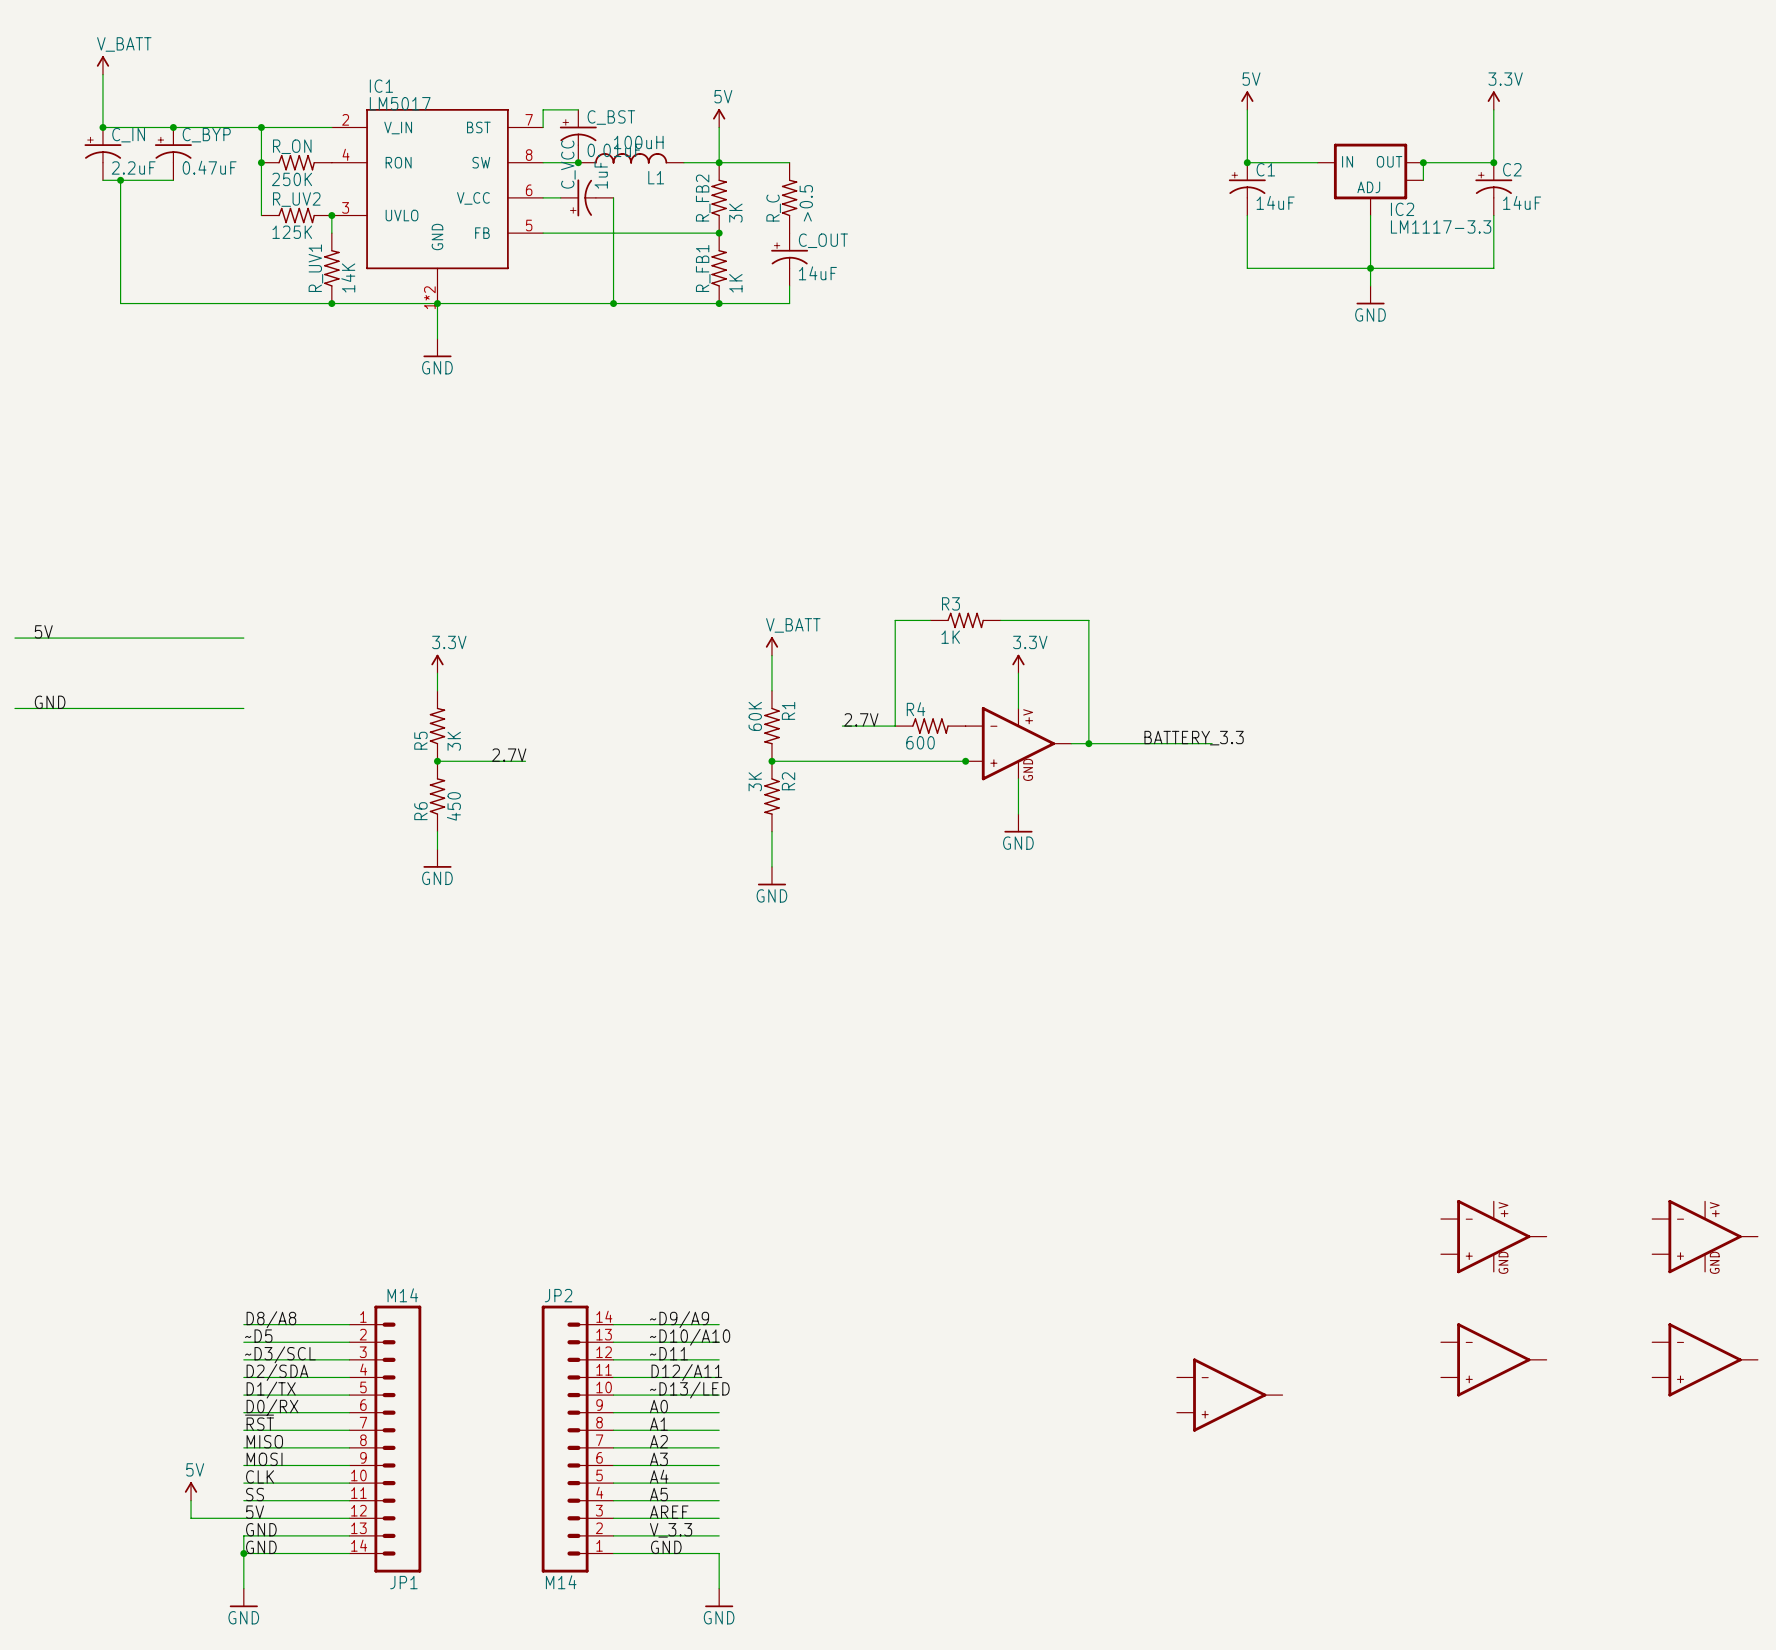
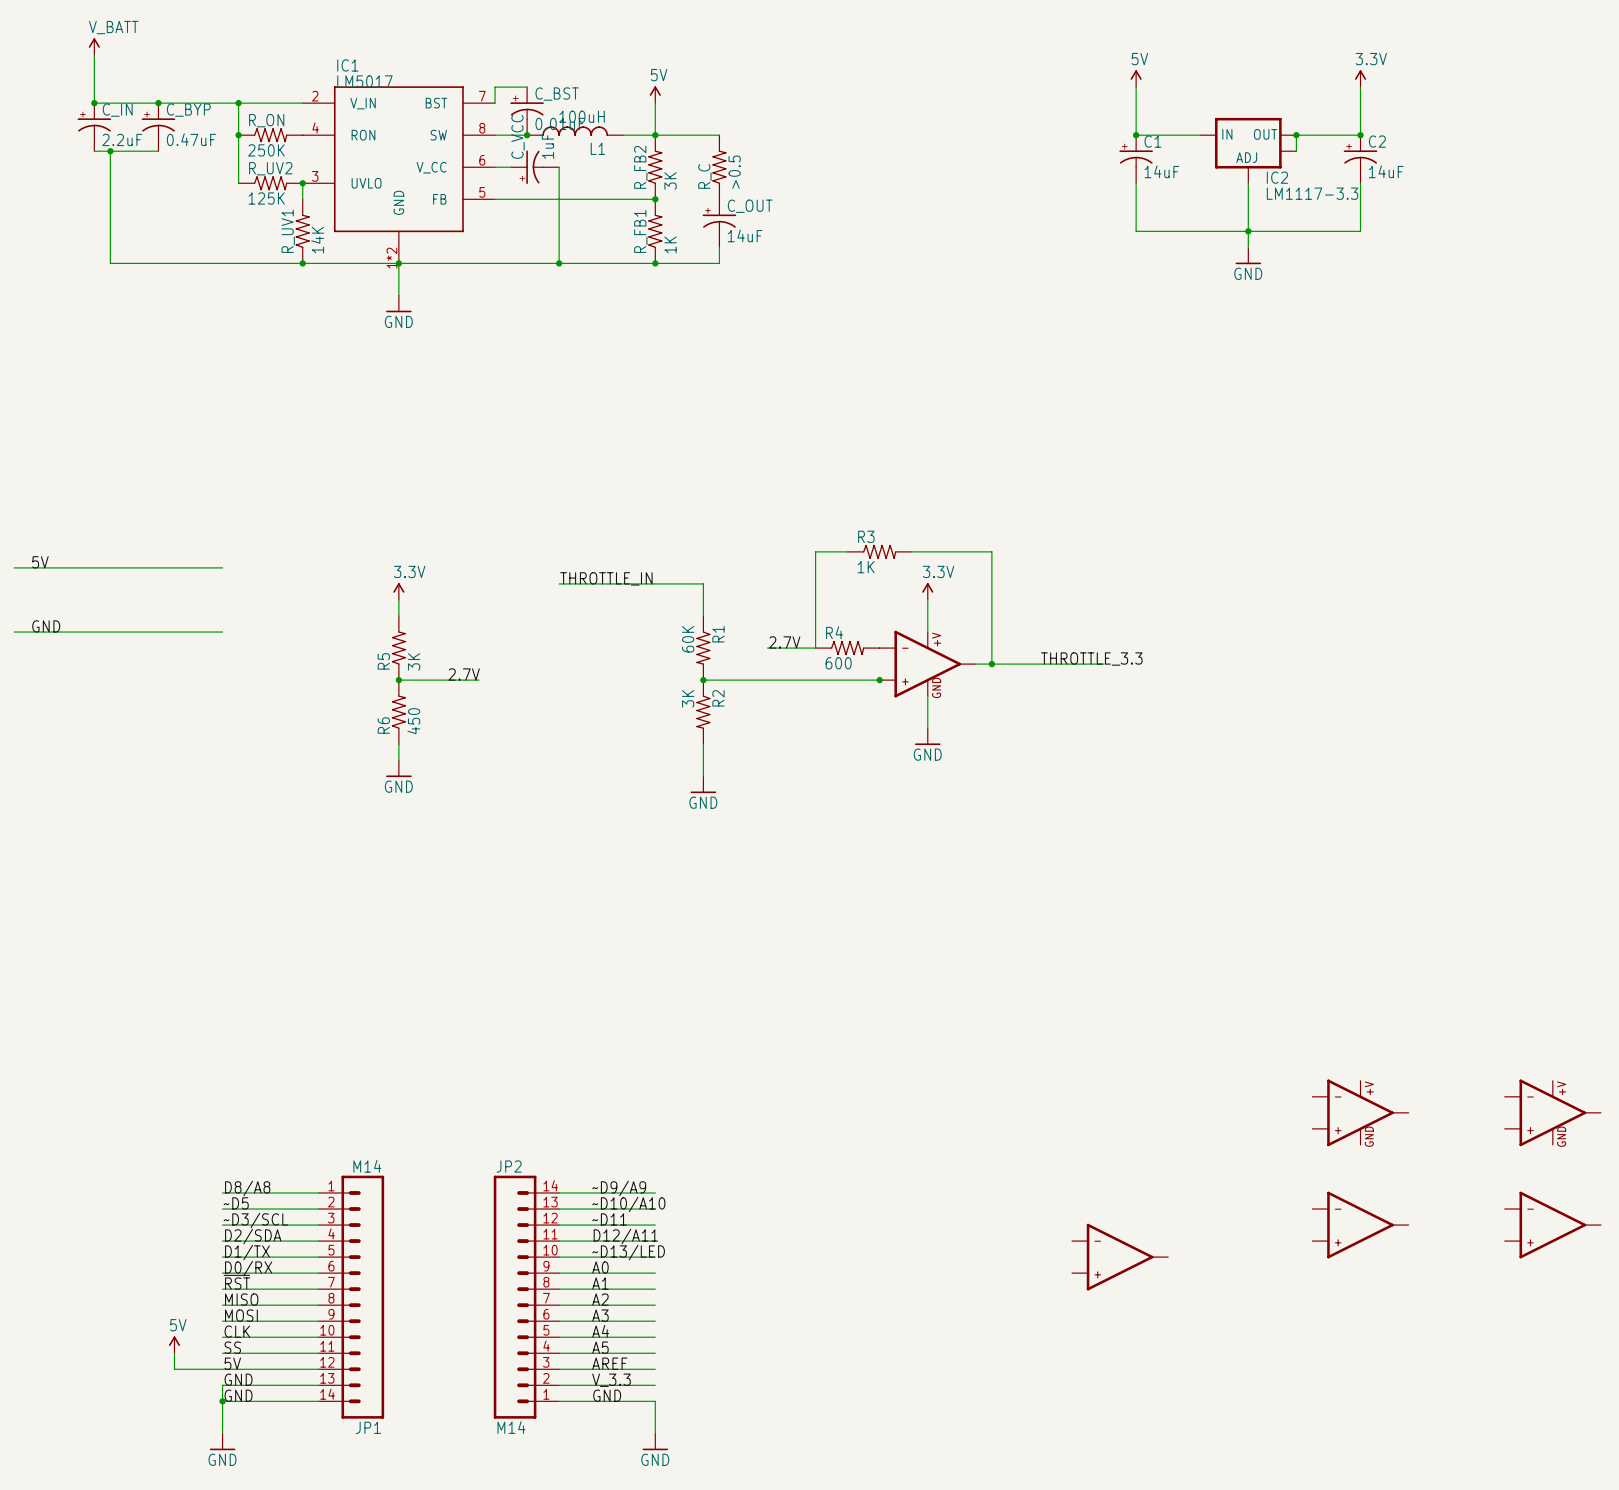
power symbol: V_BATT (771, 646) -> none
label: none -> THROTTLE_IN (606, 578)
wire: none -> (559, 583) (703, 583)
label: BATTERY_3.3 (1194, 738) -> THROTTLE_3.3 (1091, 659)

